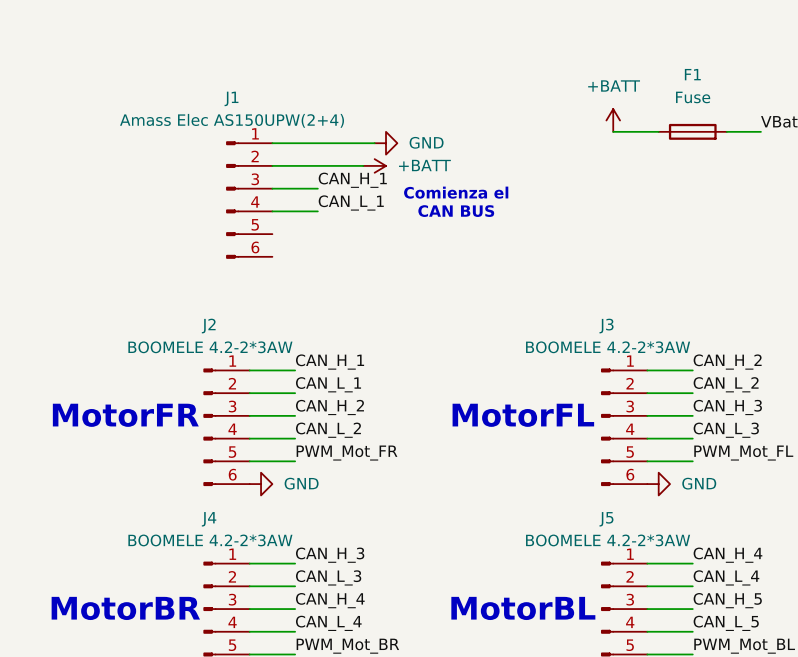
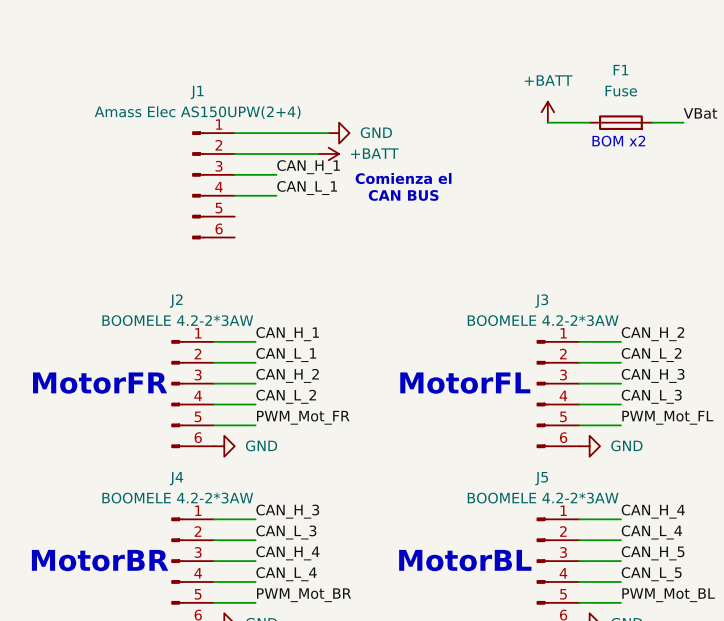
text: none -> BOM x2 (618, 141)

